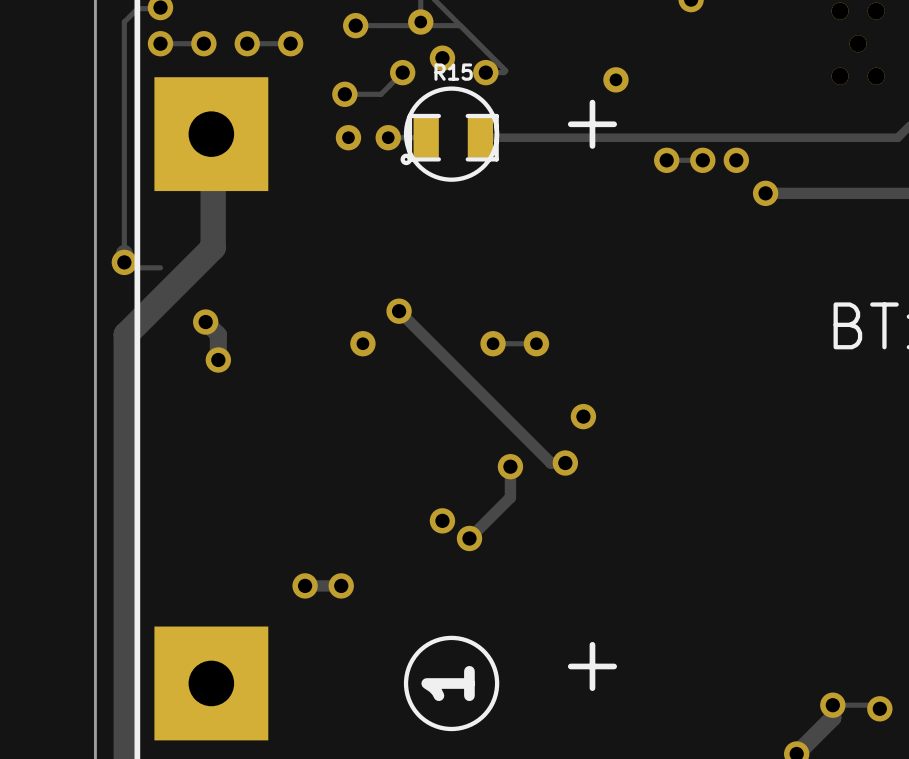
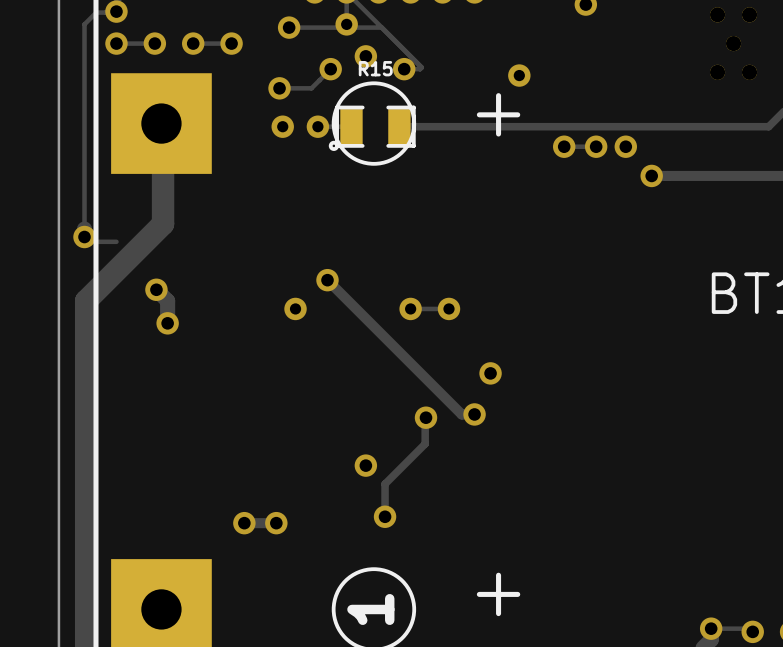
track: (510, 466) (510, 497) (469, 538) -> (425, 417) (425, 443) (385, 484) (385, 516)
via position: (469, 538) -> (385, 516)

